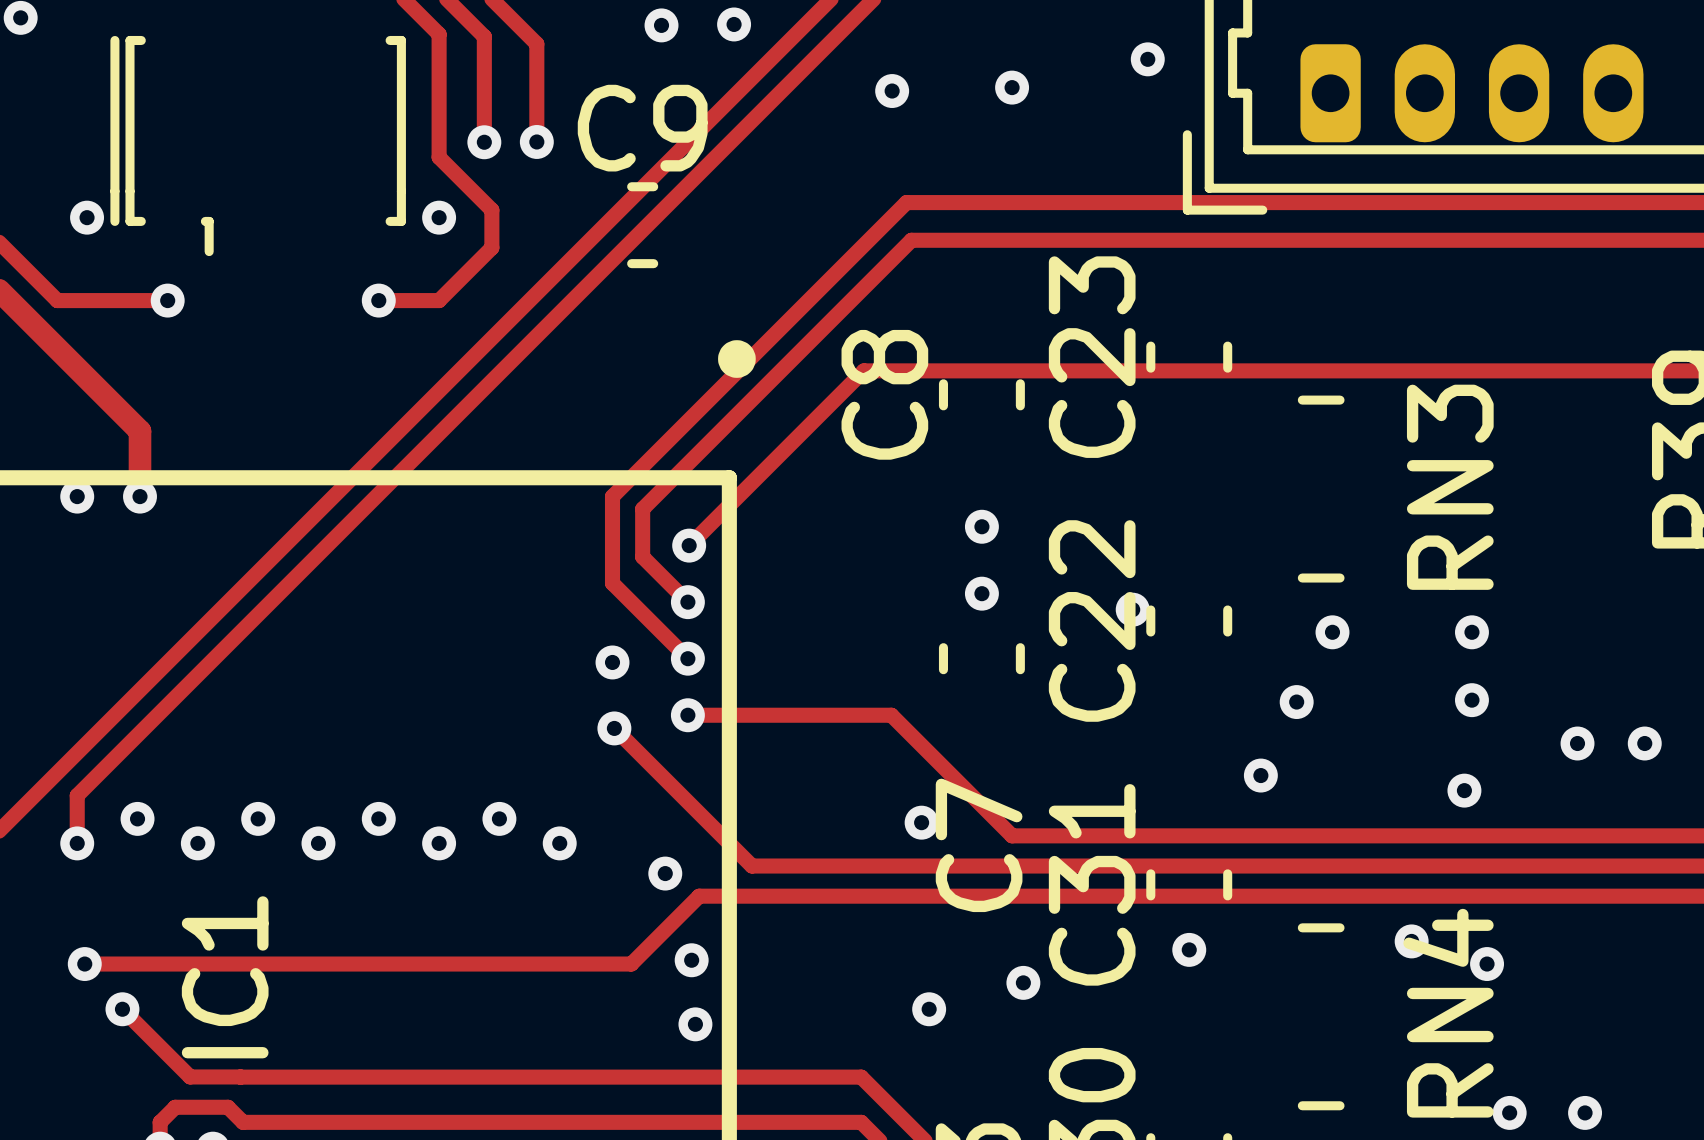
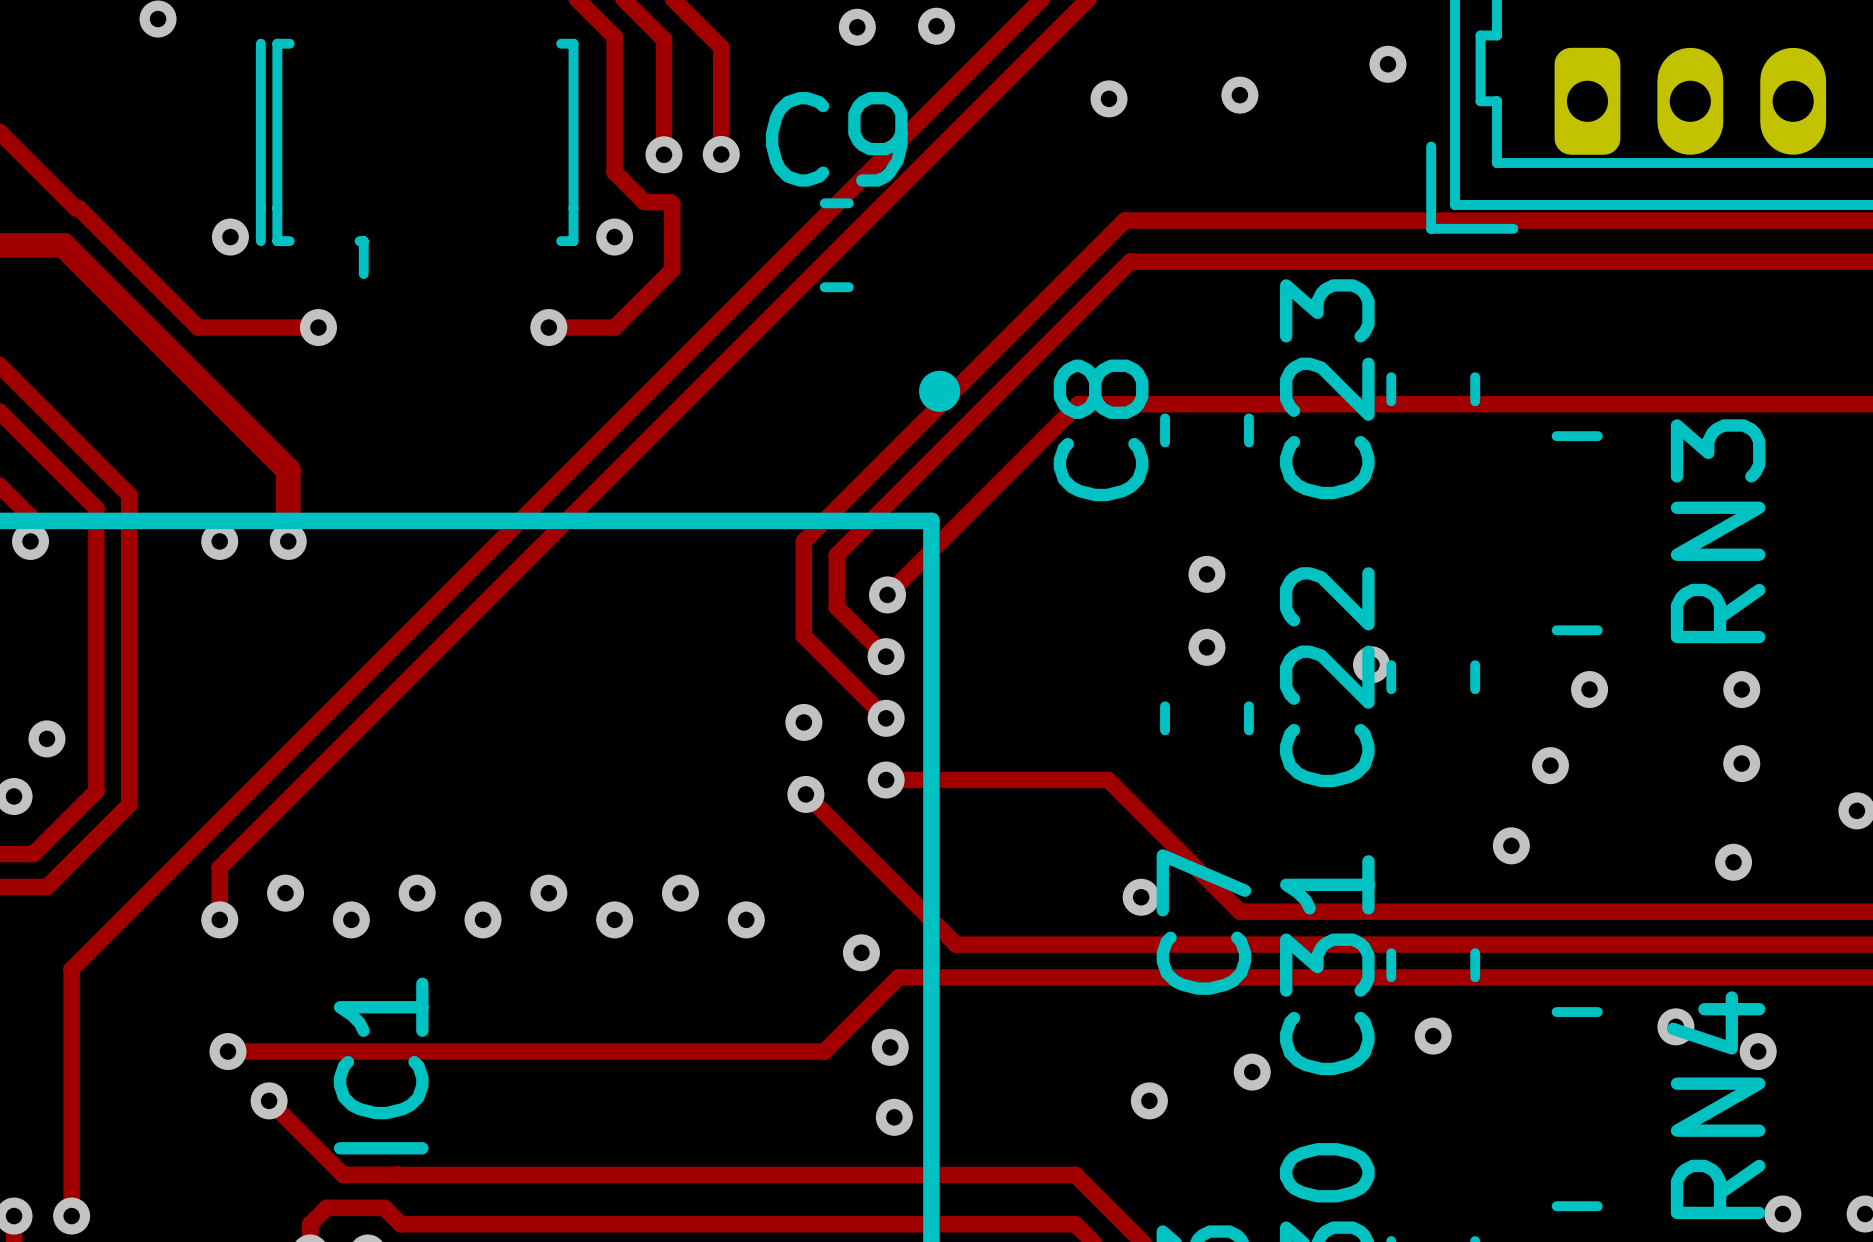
track: (439, 157) (491, 210) -> (614, 172) (644, 202) (670, 202) (672, 204) (672, 228)

